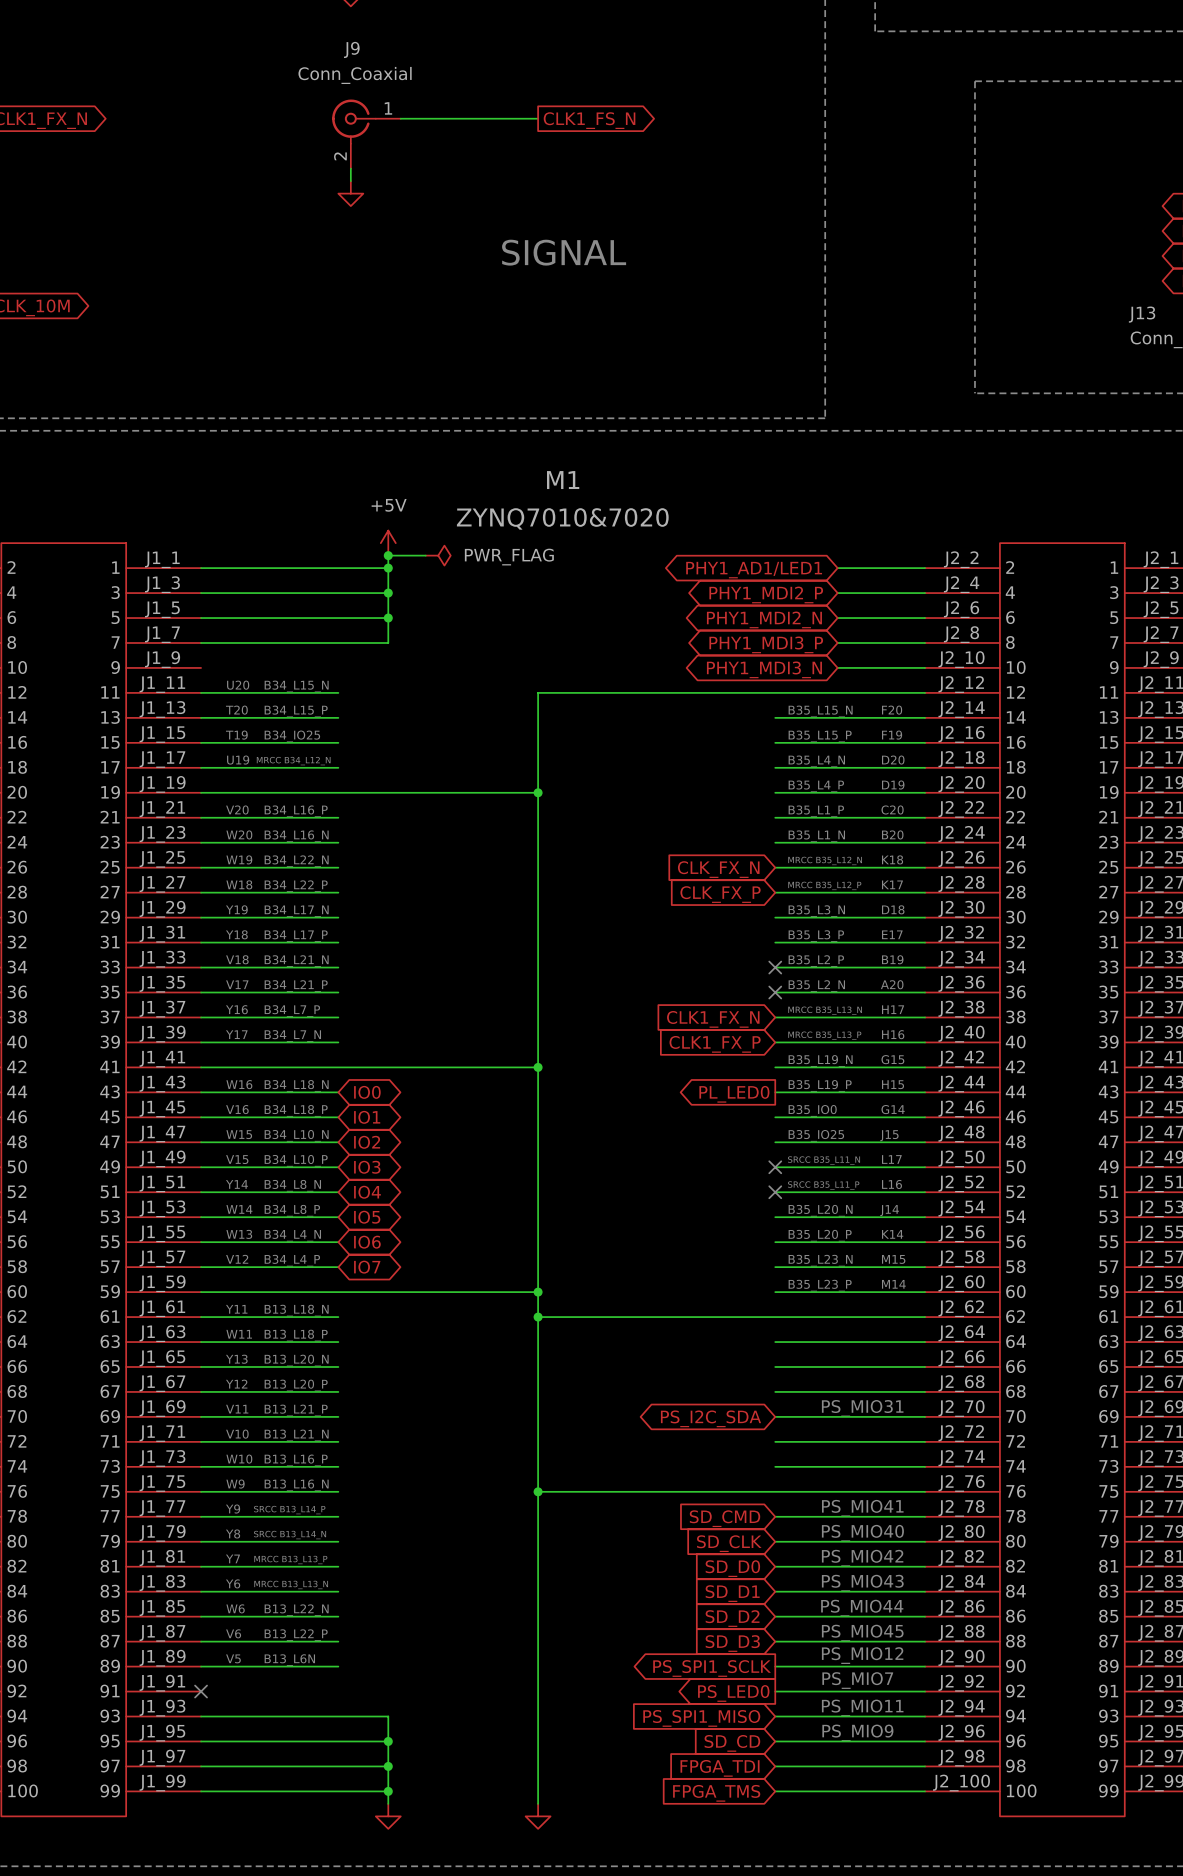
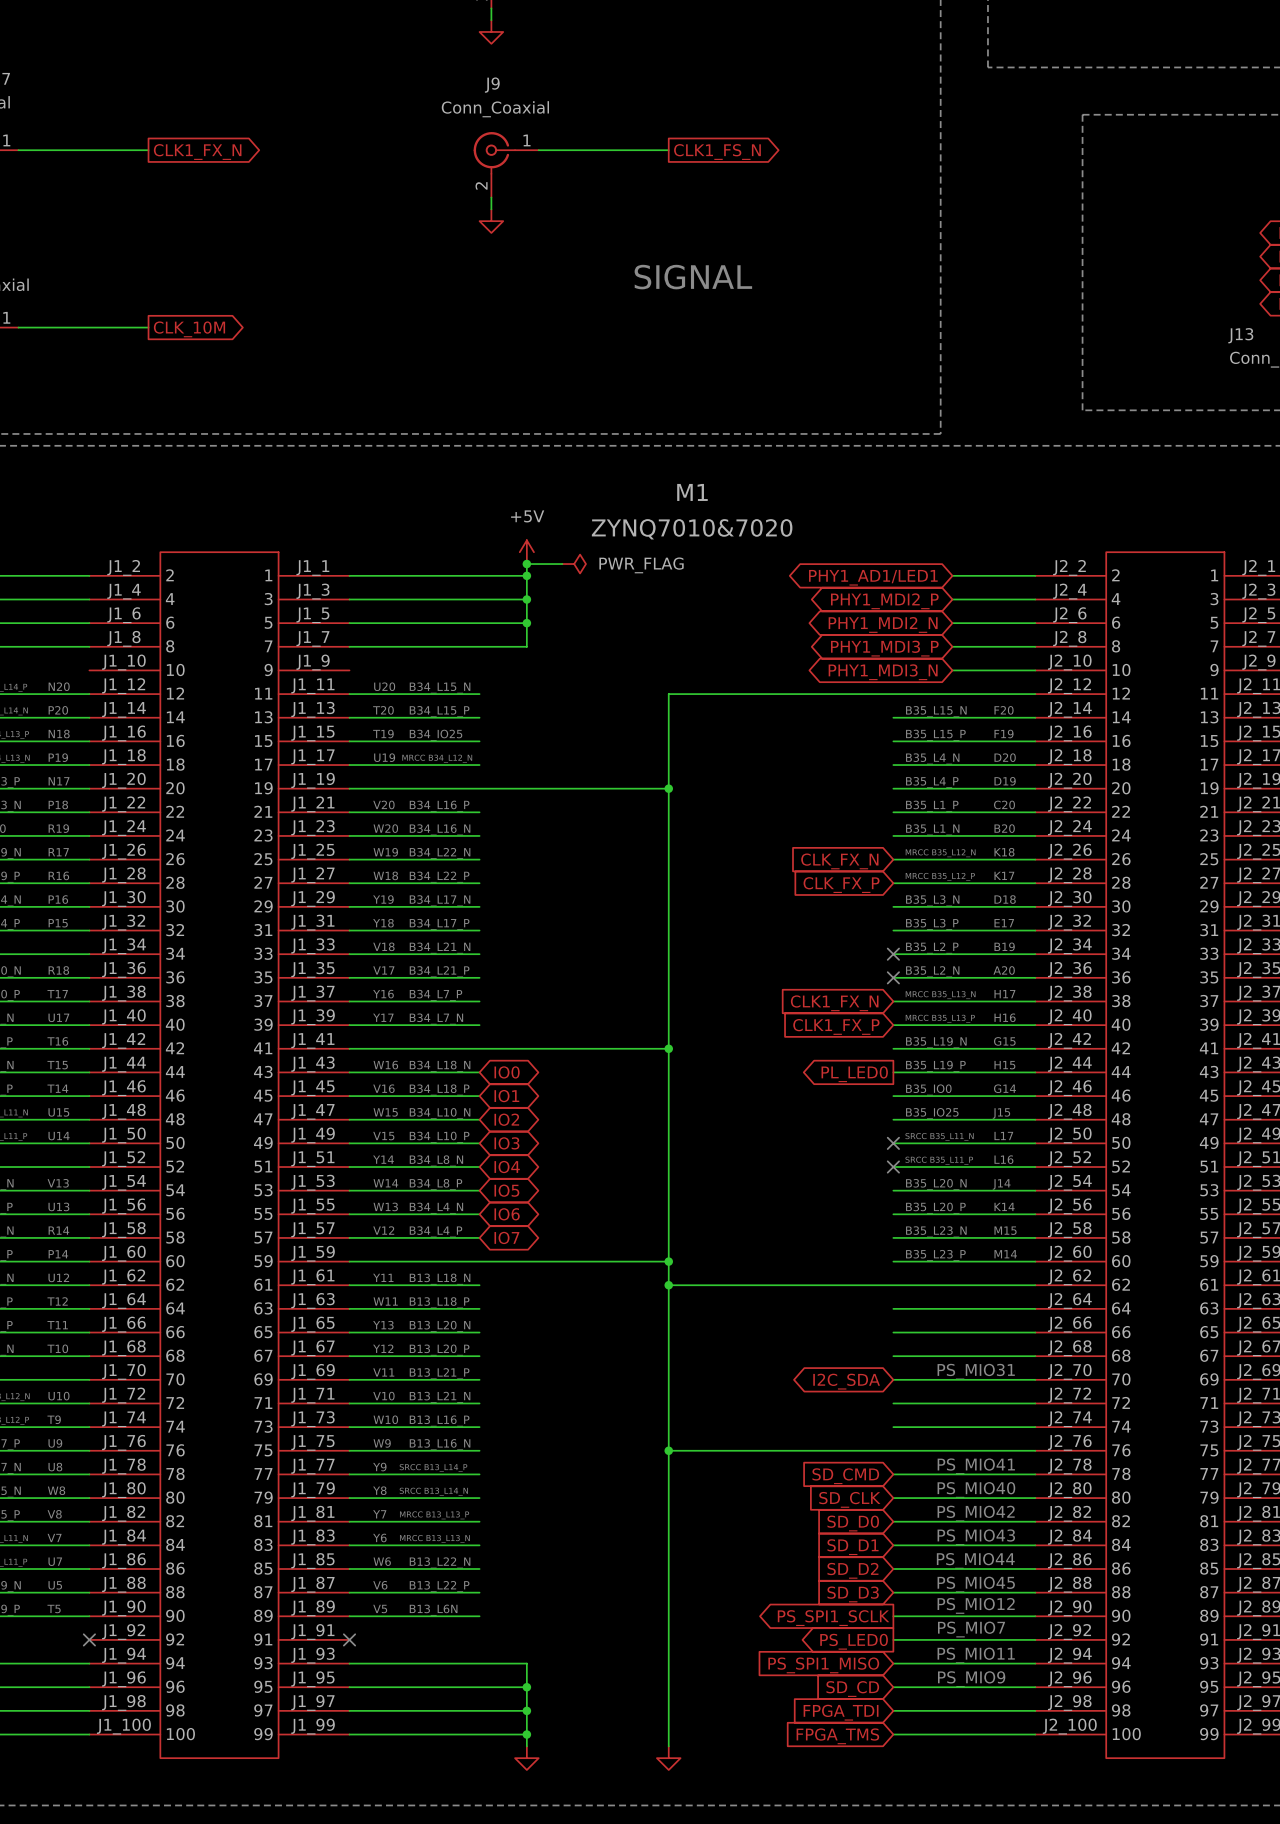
global label: PS_I2C_SDA (710, 1418) -> I2C_SDA (846, 1381)

